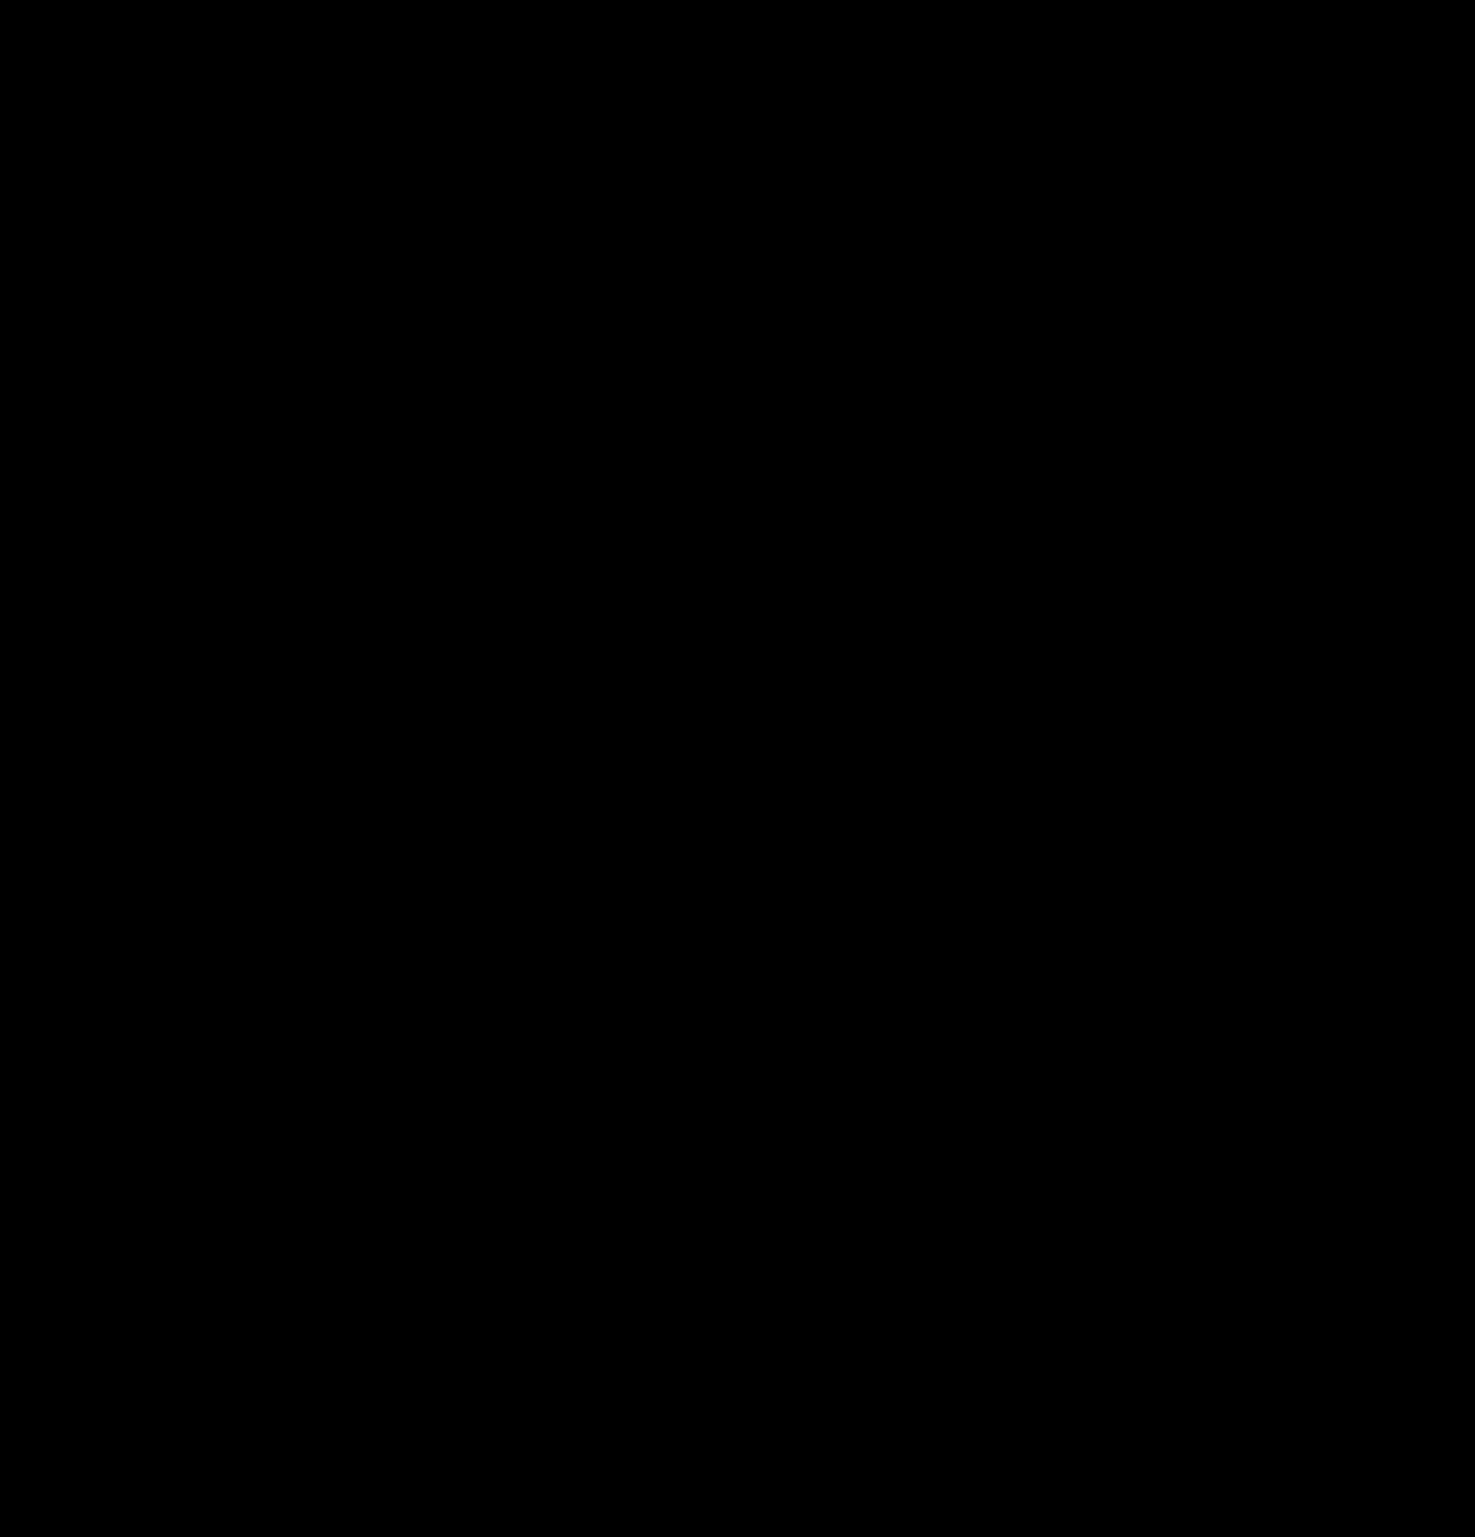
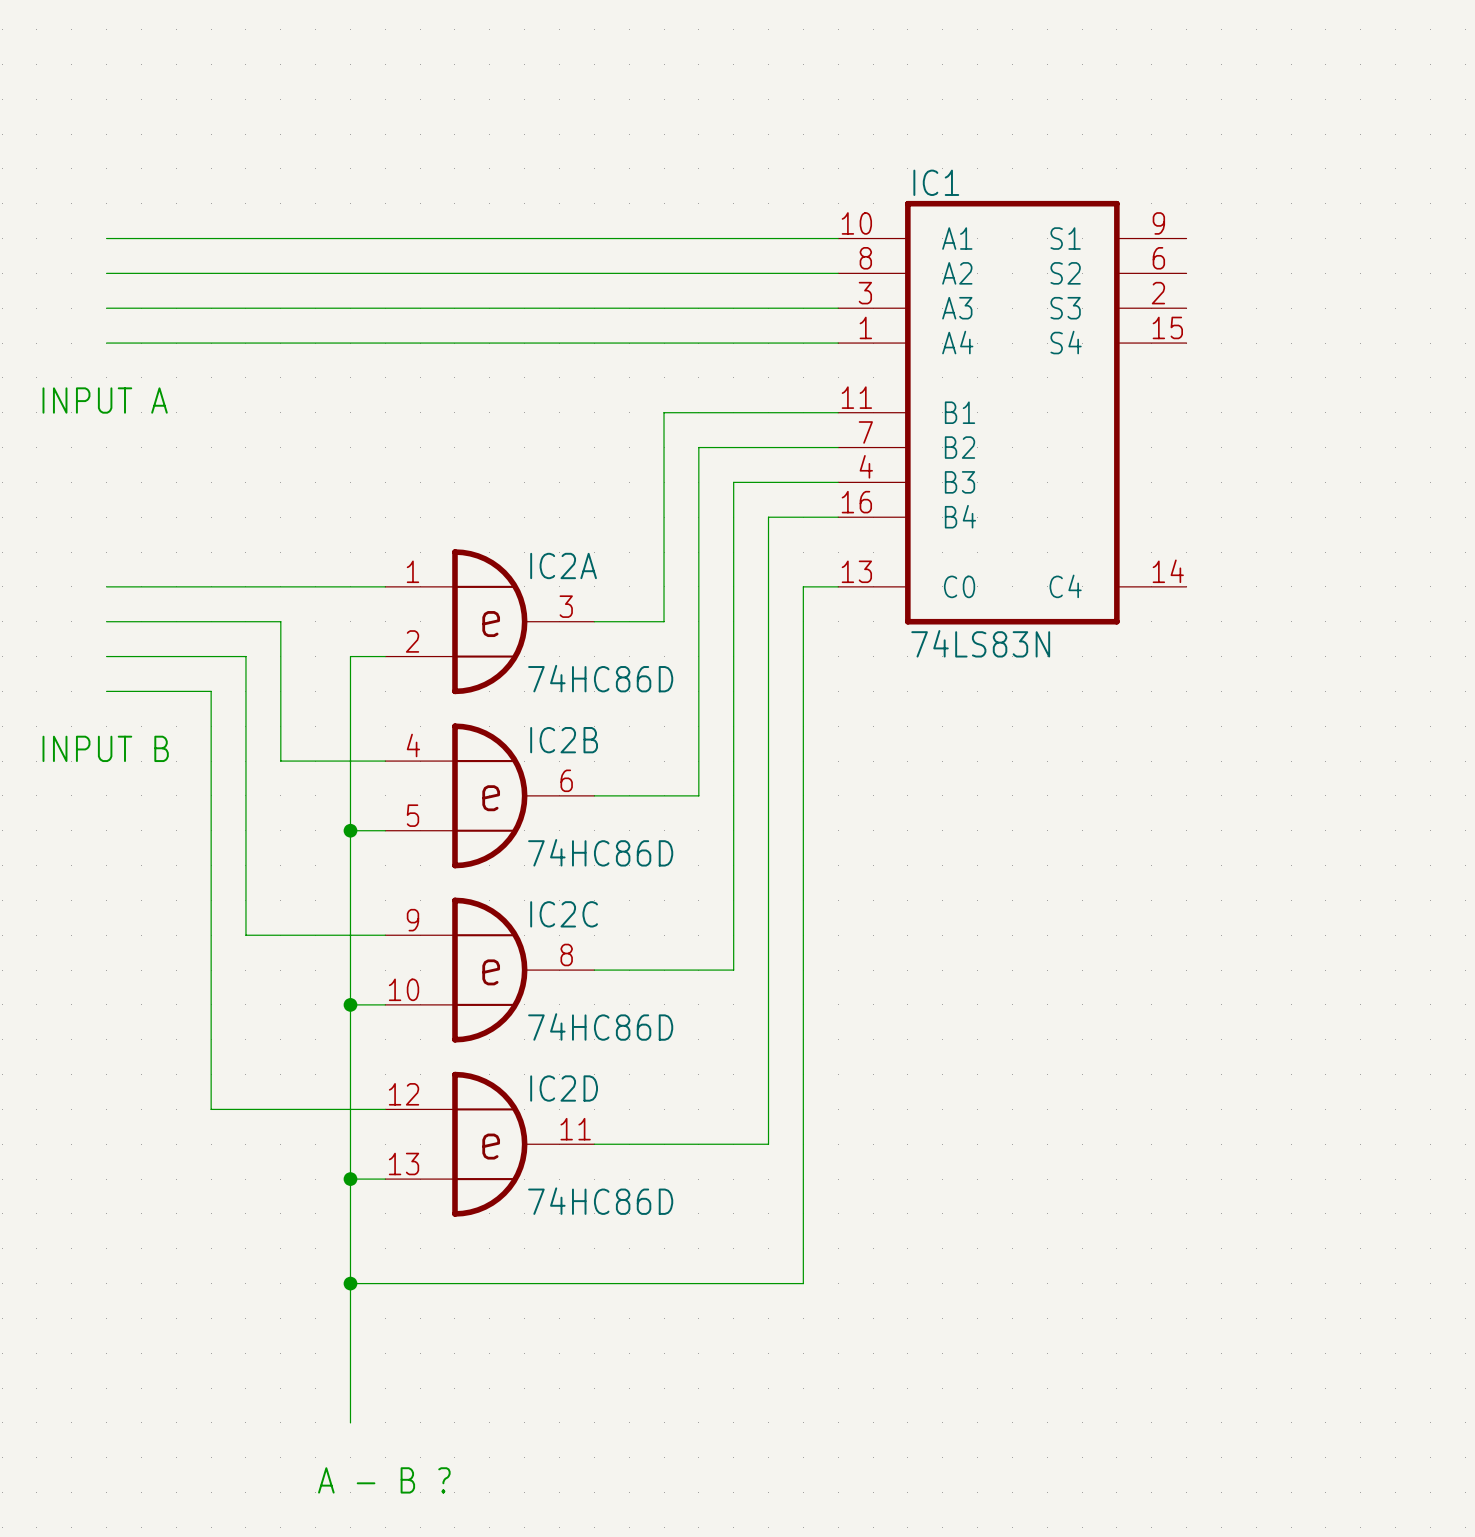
wire: none -> (106, 238) (838, 238)
wire: none -> (106, 273) (838, 273)
wire: none -> (106, 308) (838, 308)
wire: none -> (106, 343) (838, 343)
text: none -> INPUT A (105, 400)
wire: none -> (838, 412) (664, 412) (664, 621) (594, 621)
IC1: none -> 74LS83N (1012, 412)
wire: none -> (838, 447) (698, 447) (698, 795) (594, 795)
wire: none -> (838, 482) (733, 482) (733, 970) (594, 970)
wire: none -> (838, 517) (768, 517) (768, 1144) (594, 1144)
wire: none -> (106, 586) (385, 586)
wire: none -> (838, 586) (803, 586) (803, 1283) (350, 1283)
wire: none -> (106, 621) (280, 621) (280, 761) (385, 761)
IC2A: none -> 74HC86D (489, 621)
wire: none -> (106, 656) (245, 656) (245, 935) (385, 935)
wire: none -> (385, 656) (350, 656) (350, 1422)
wire: none -> (106, 691) (211, 691) (211, 1109) (385, 1109)
text: none -> INPUT B (105, 748)
IC2B: none -> 74HC86D (489, 795)
wire: none -> (350, 830) (385, 830)
junction: none -> (350, 830)
IC2C: none -> 74HC86D (489, 970)
wire: none -> (350, 1004) (385, 1004)
junction: none -> (350, 1004)
IC2D: none -> 74HC86D (489, 1144)
wire: none -> (350, 1179) (385, 1179)
junction: none -> (350, 1179)
junction: none -> (350, 1283)
text: none -> A - B ? (384, 1480)

